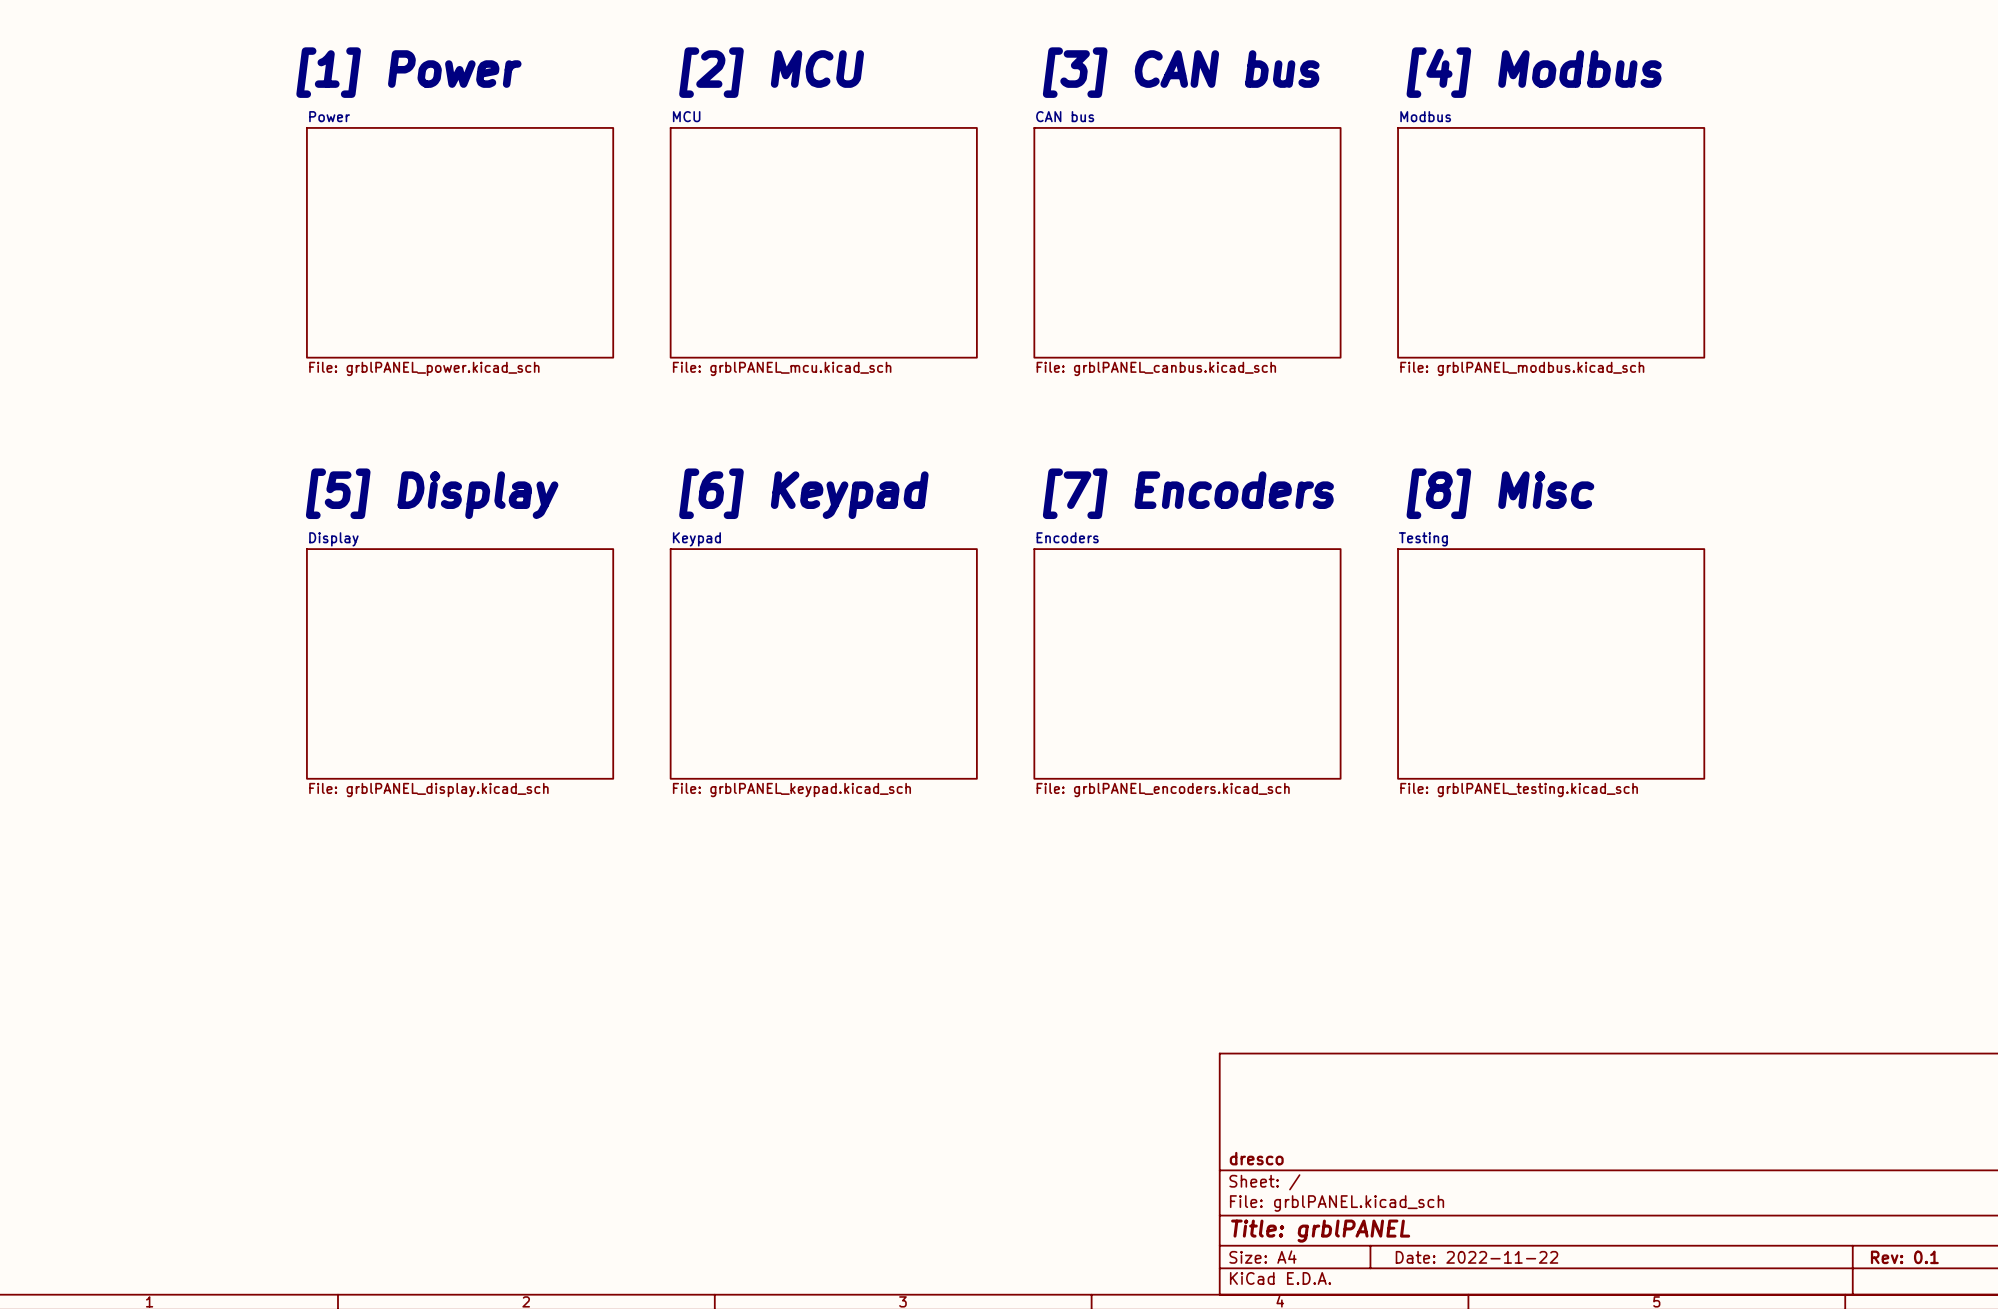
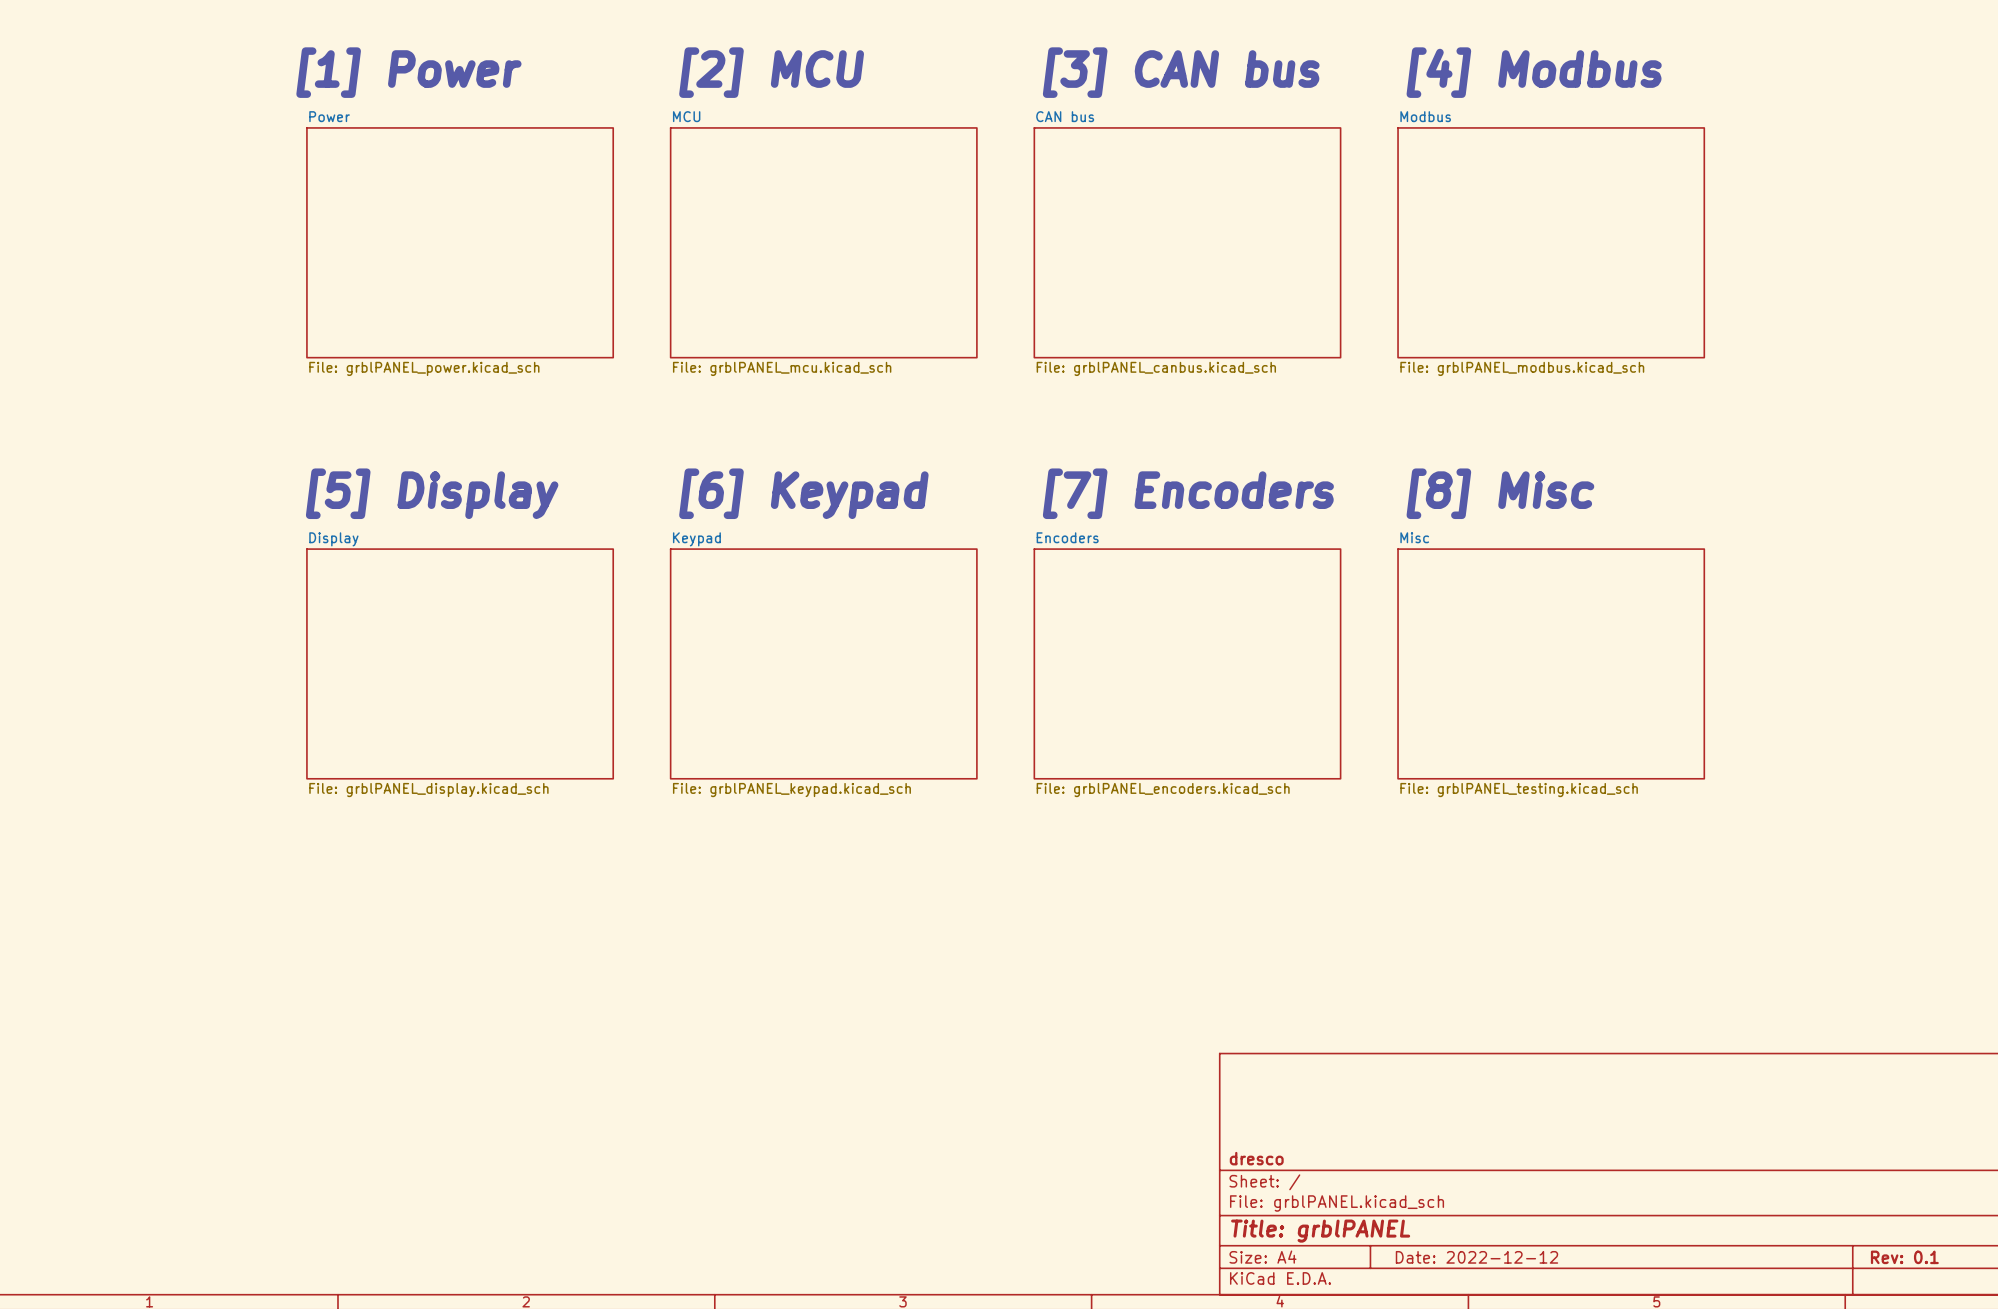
sheet Testing name: Testing (1423, 539) -> Misc (1414, 537)
title block: Date: 2022-11-22 (1476, 1257) -> Date: 2022-12-12 (1476, 1257)

